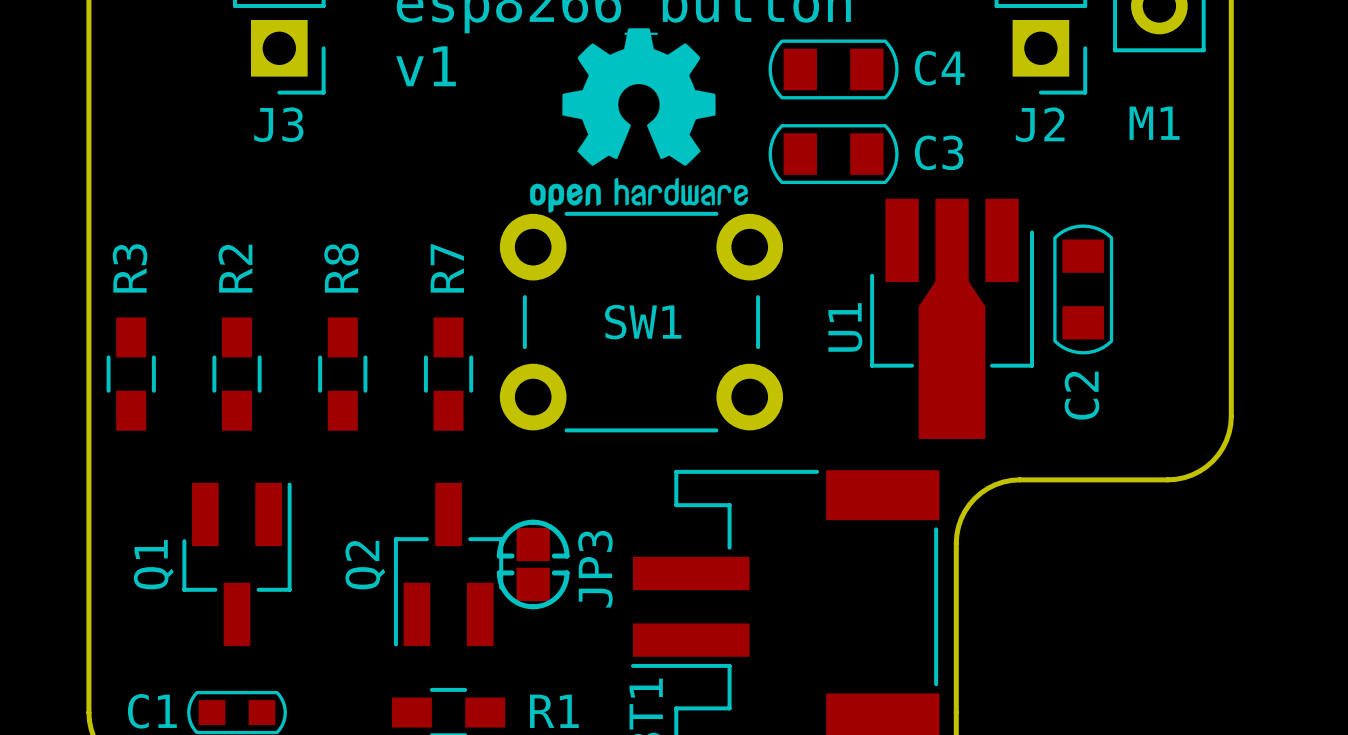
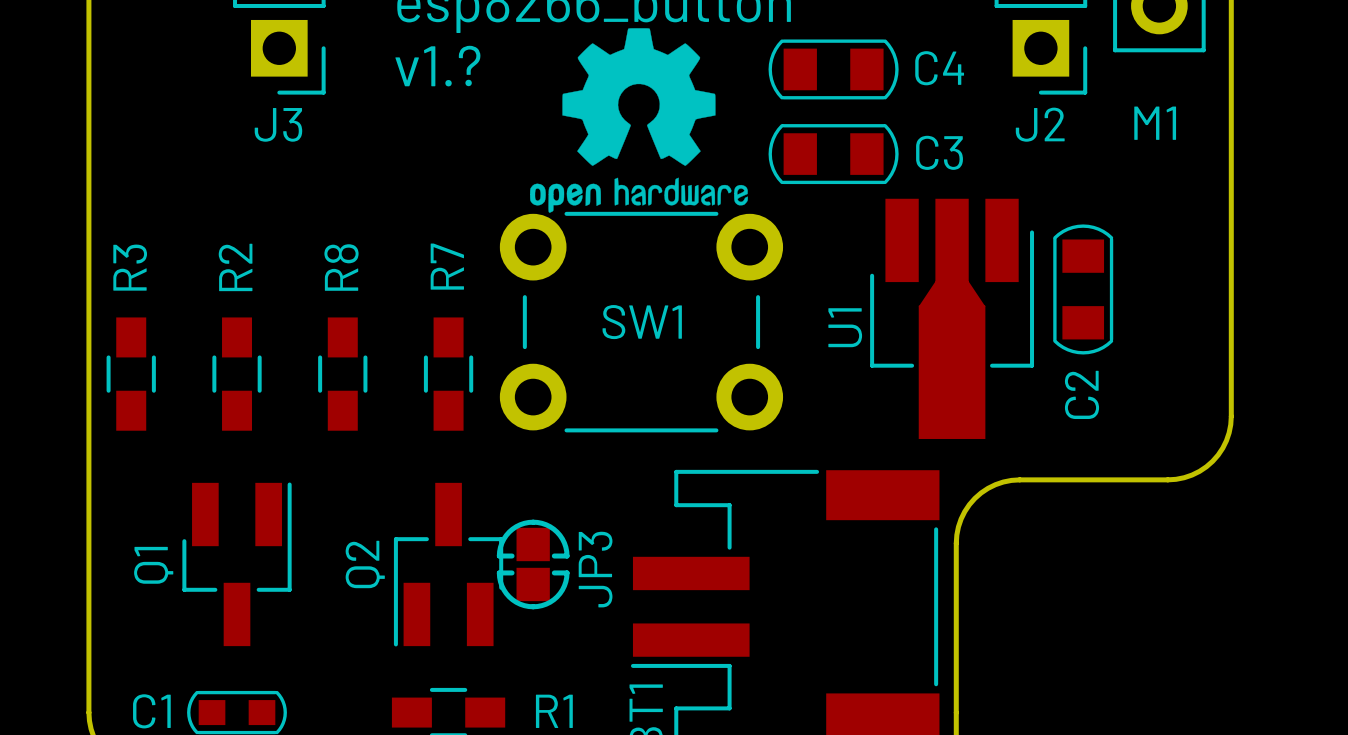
text: v1 (426, 66) -> v1.? (437, 66)

